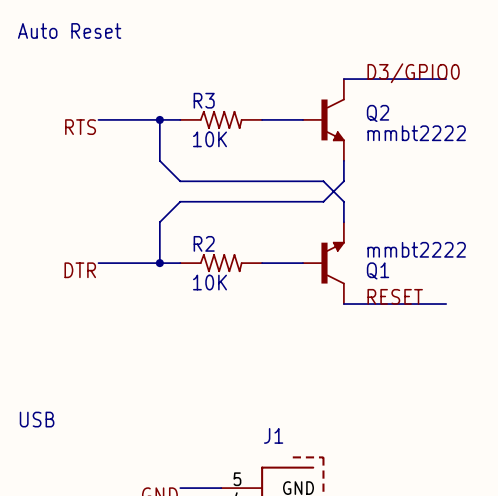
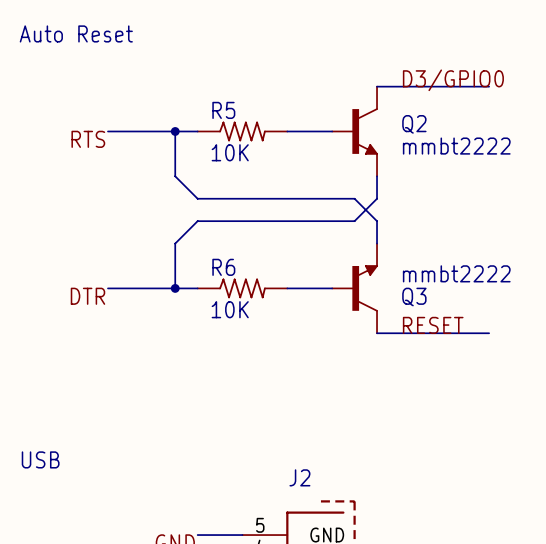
R3 name: R3 (204, 100) -> R5 (223, 110)
R2 name: R2 (204, 243) -> R6 (223, 267)
Q1 name: Q1 (378, 270) -> Q3 (414, 297)
J1 name: J1 (273, 435) -> J2 (299, 477)

